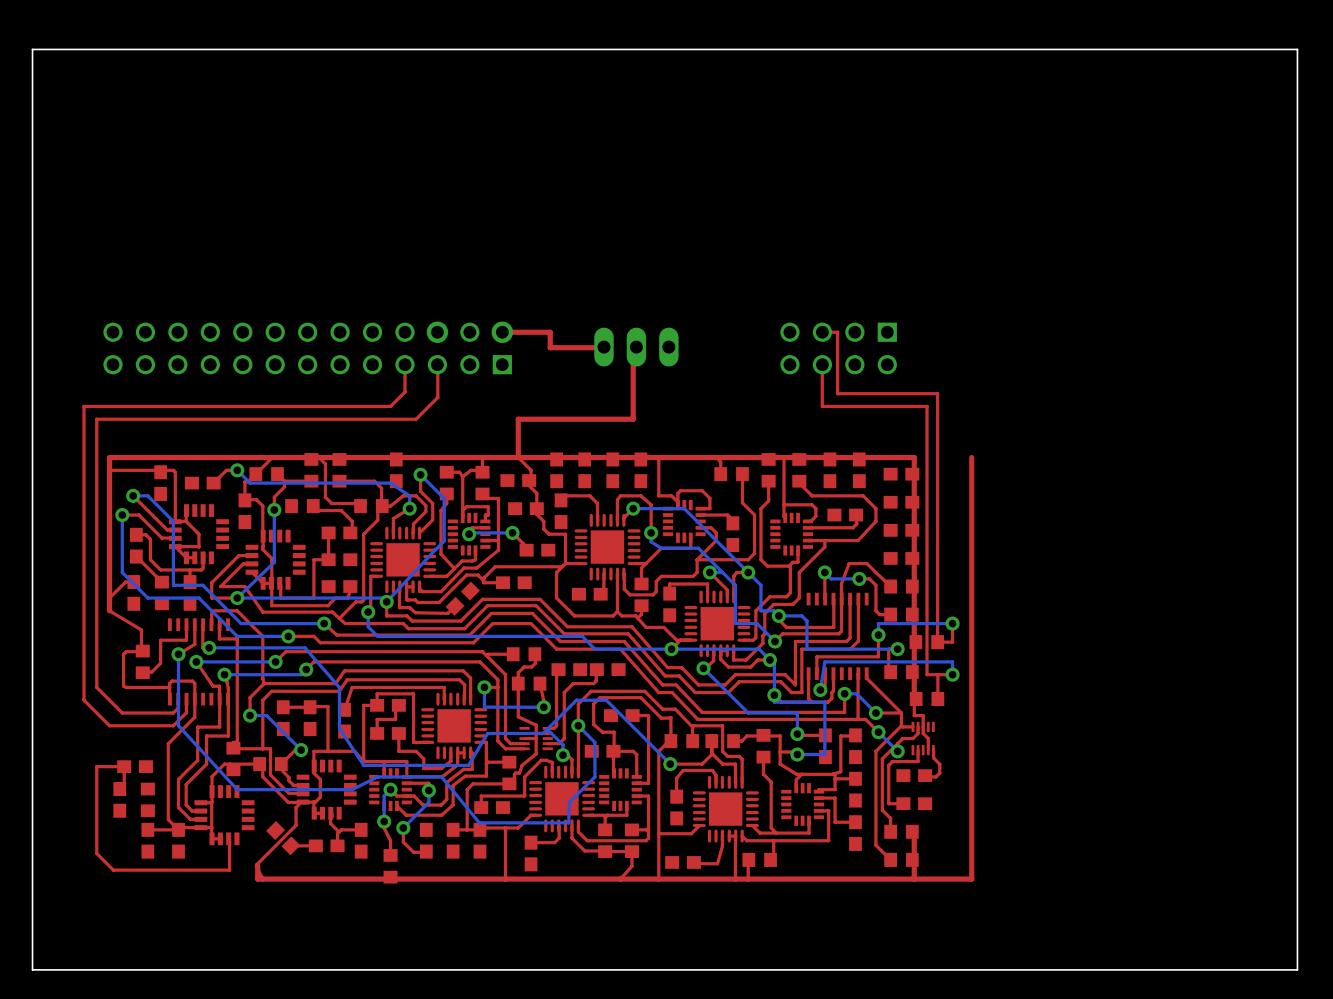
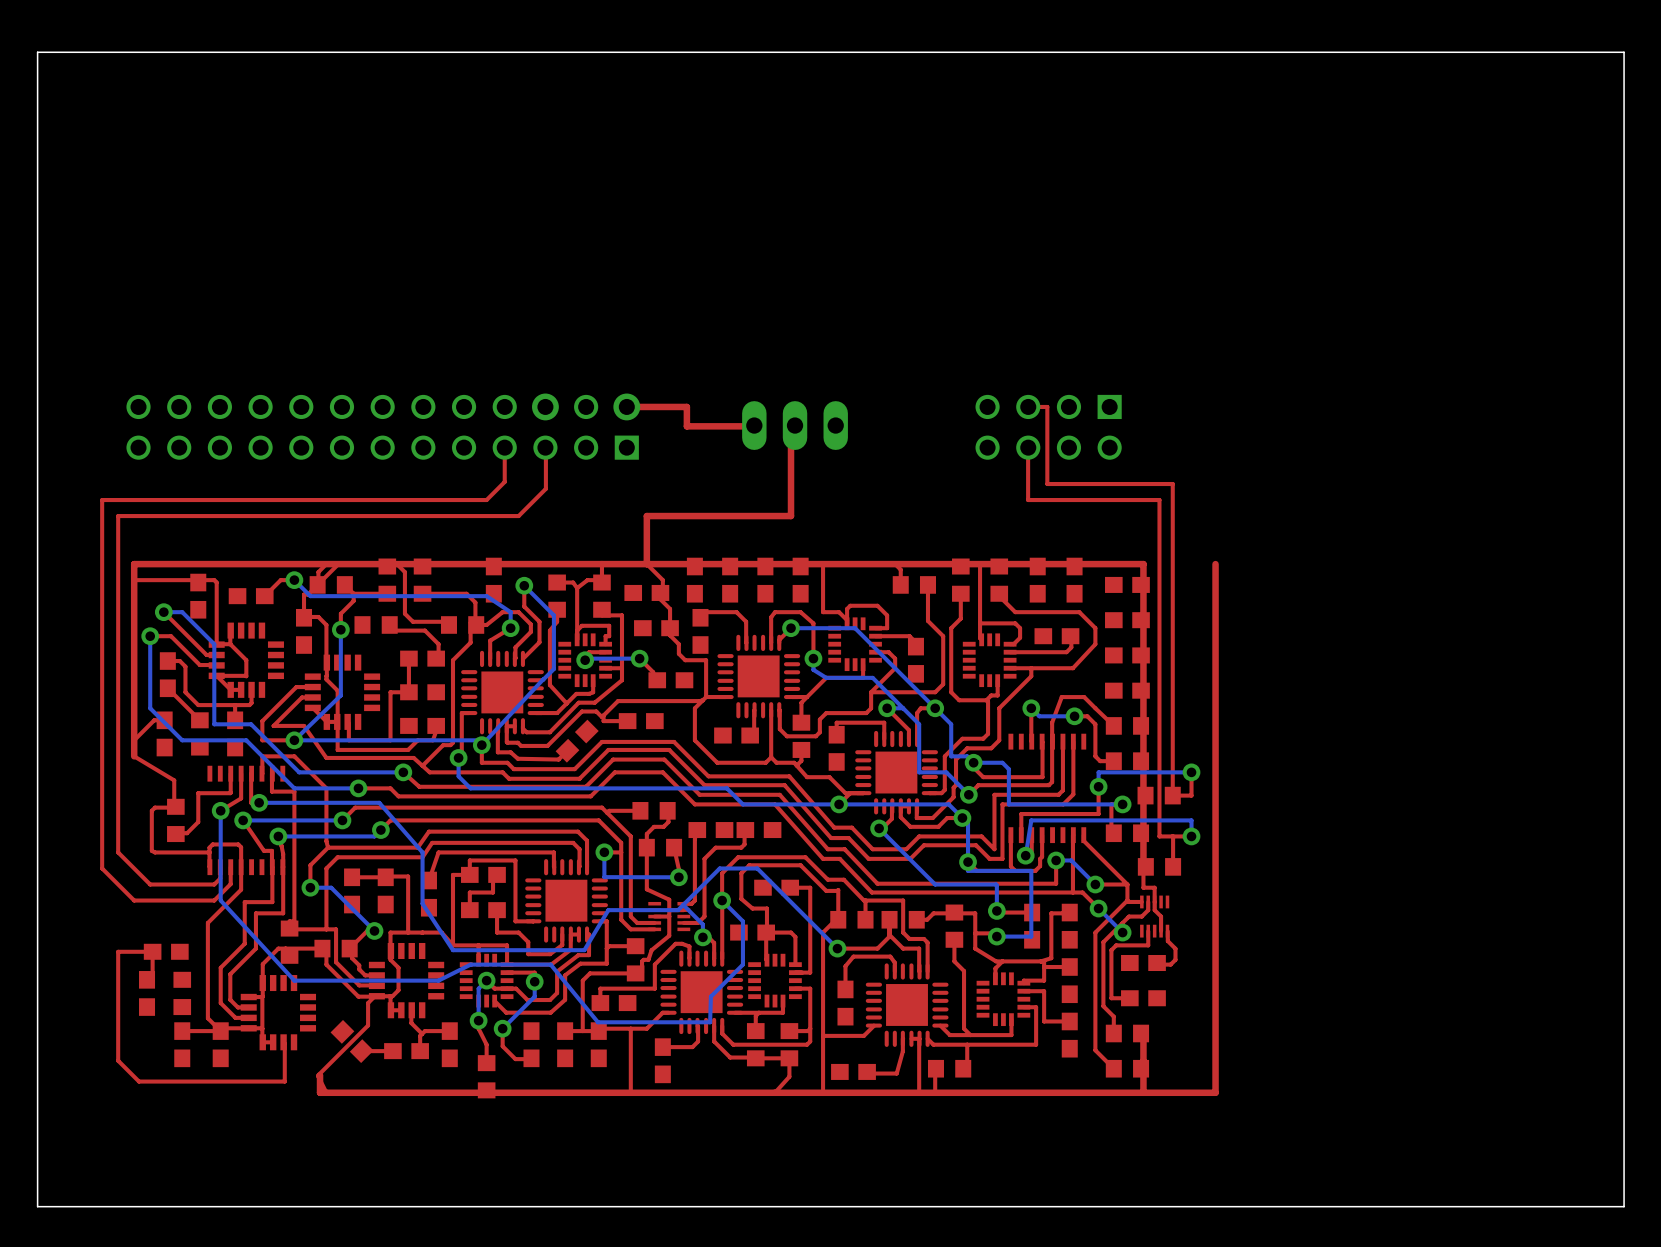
top track: none -> (326, 564) (318, 572) (318, 585)

